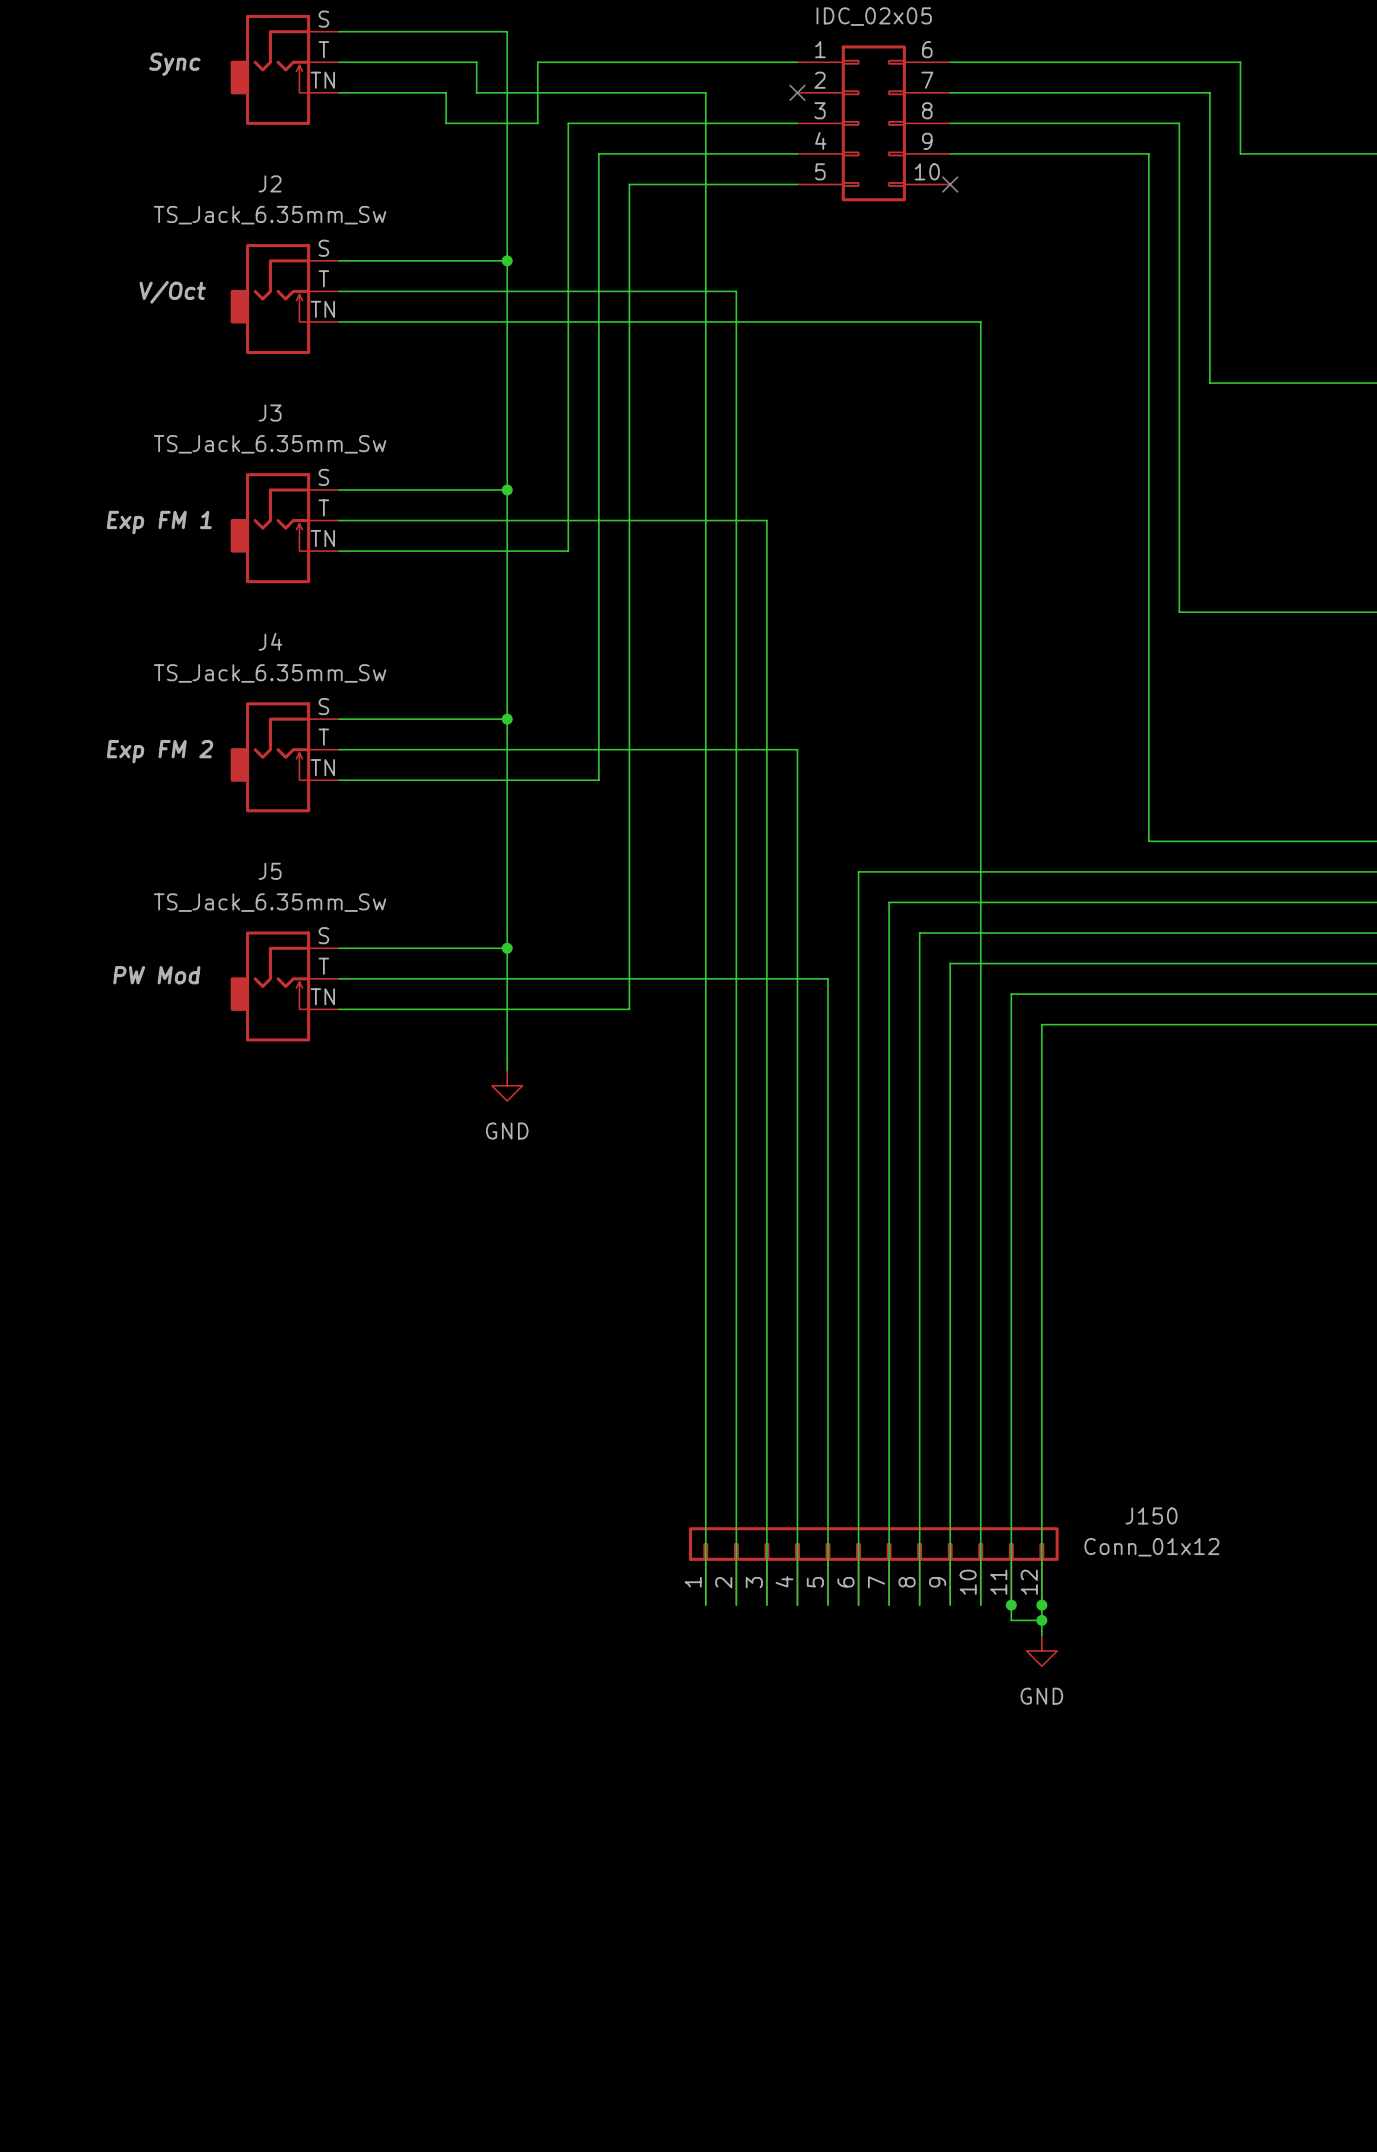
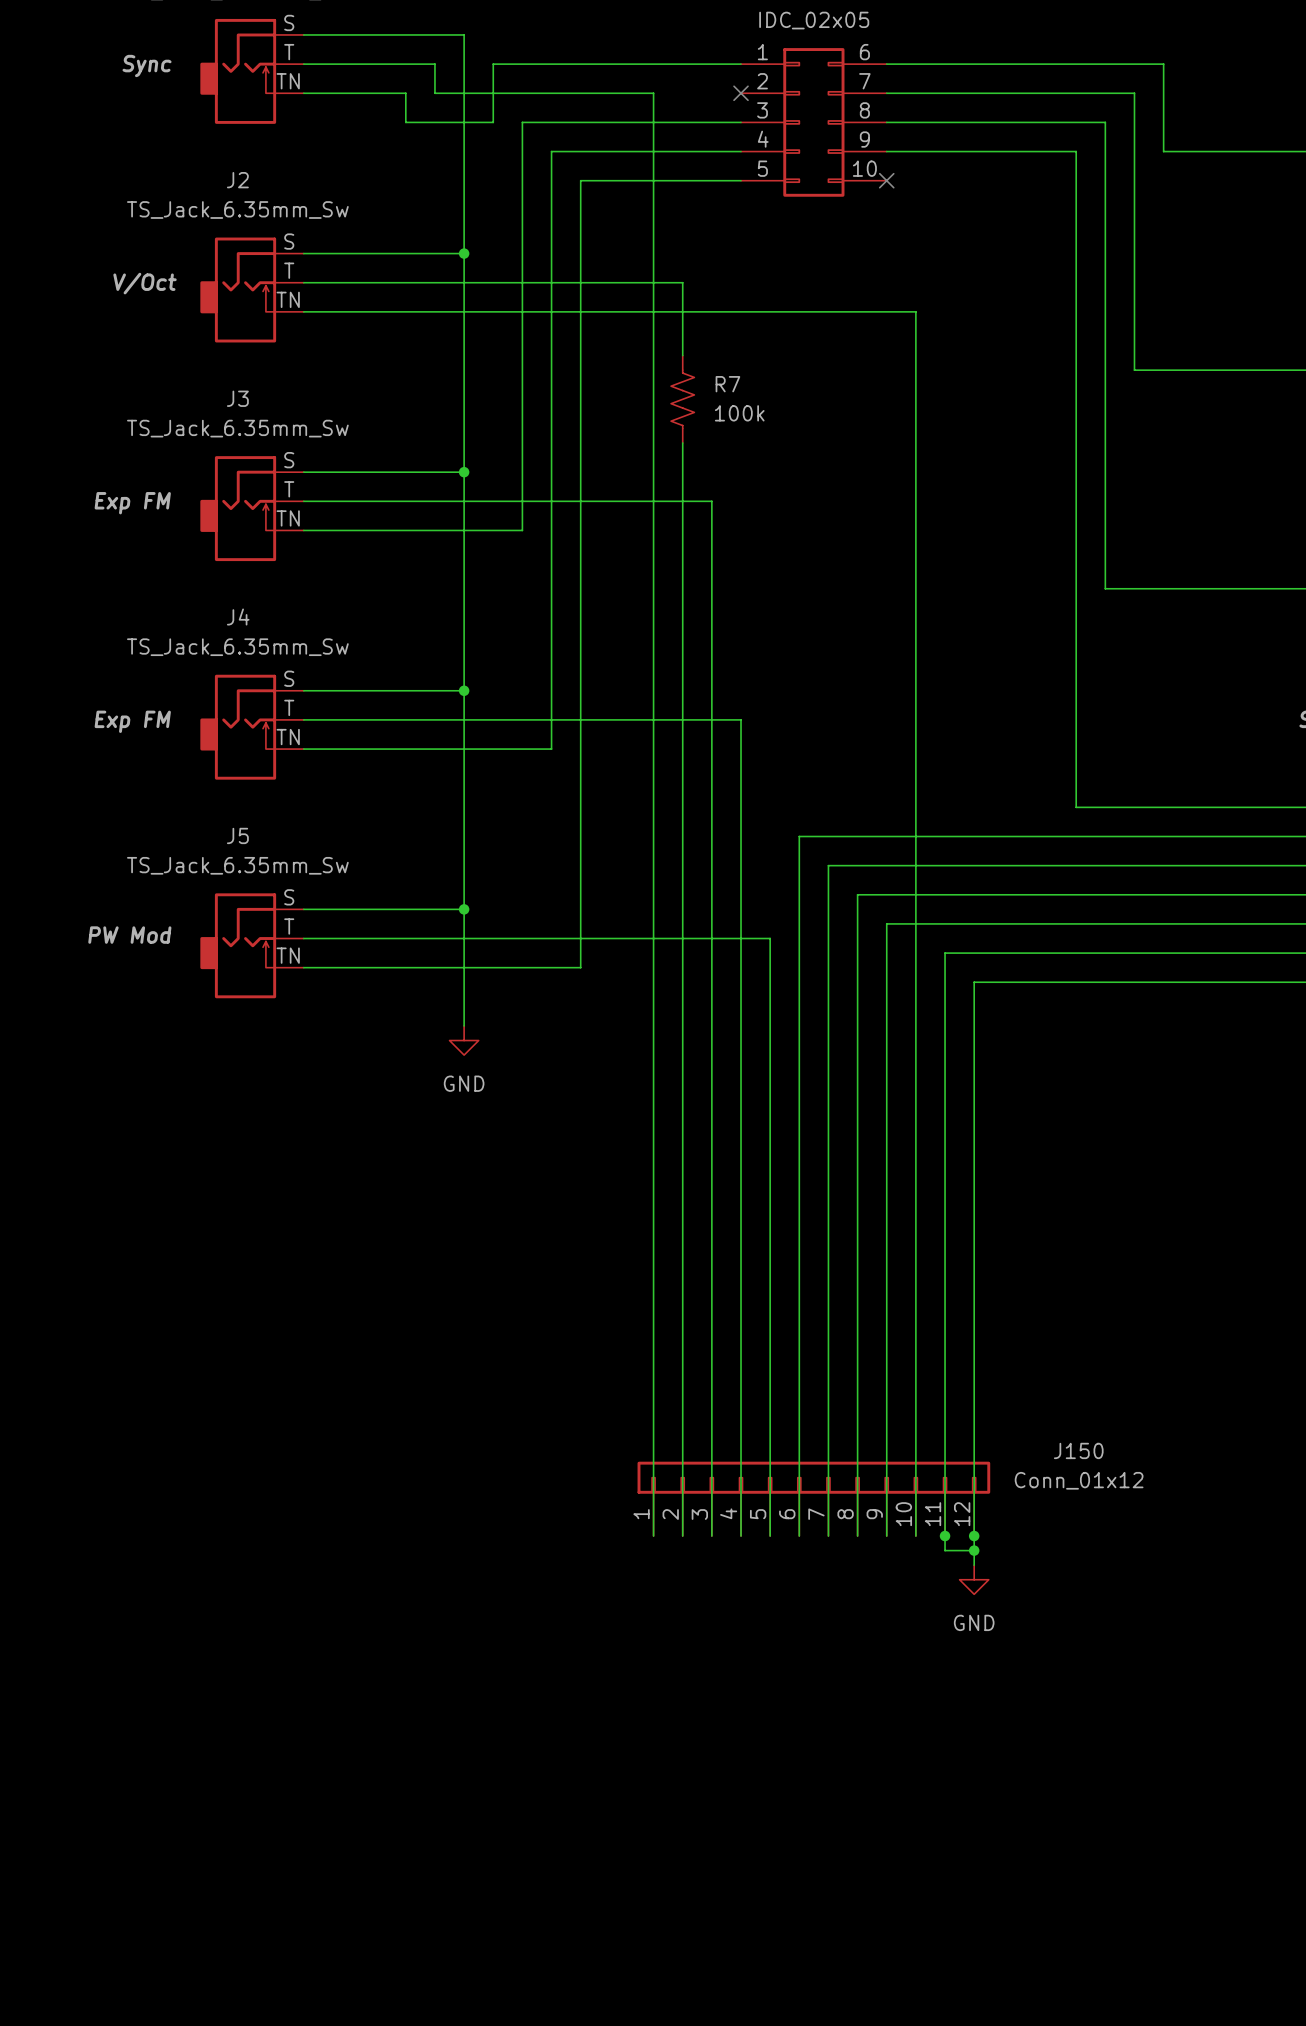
R7: none -> 100k (682, 399)
J3 text: Exp FM 1 (159, 522) -> Exp FM (132, 503)
J4 text: Exp FM 2 (160, 751) -> Exp FM (132, 721)

